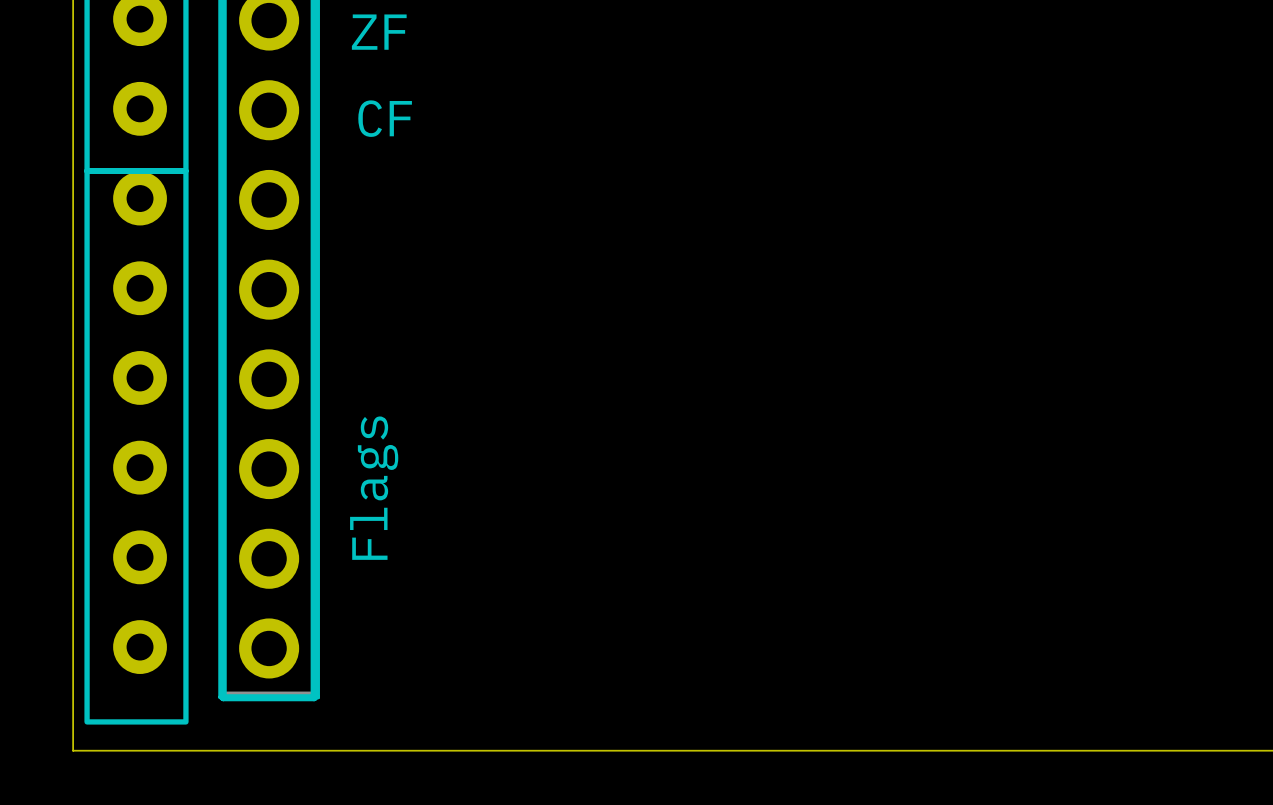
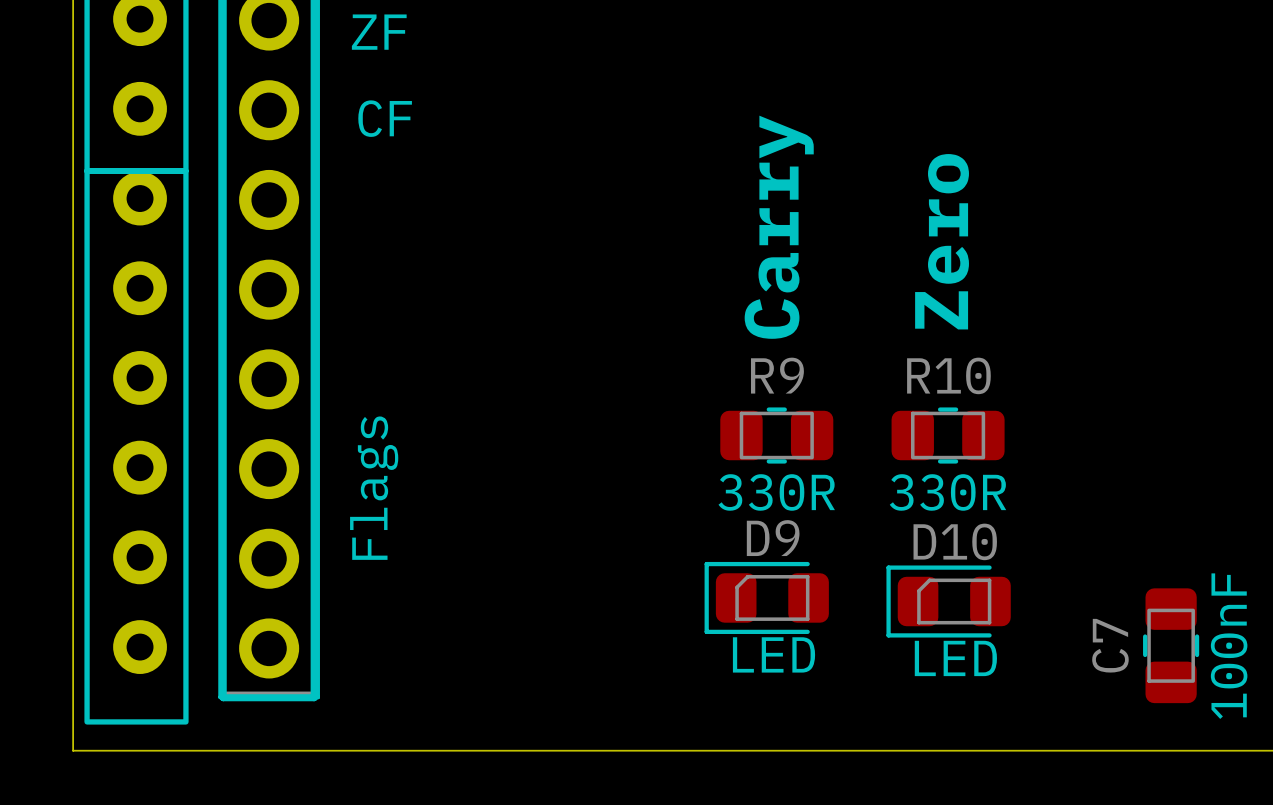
text: none -> Carry (779, 227)
text: none -> Zero (942, 241)
R9: none -> 330R (776, 435)
R10: none -> 330R (948, 435)
D9: none -> LED (766, 597)
D10: none -> LED (948, 601)
C7: none -> 100nF (1171, 645)

